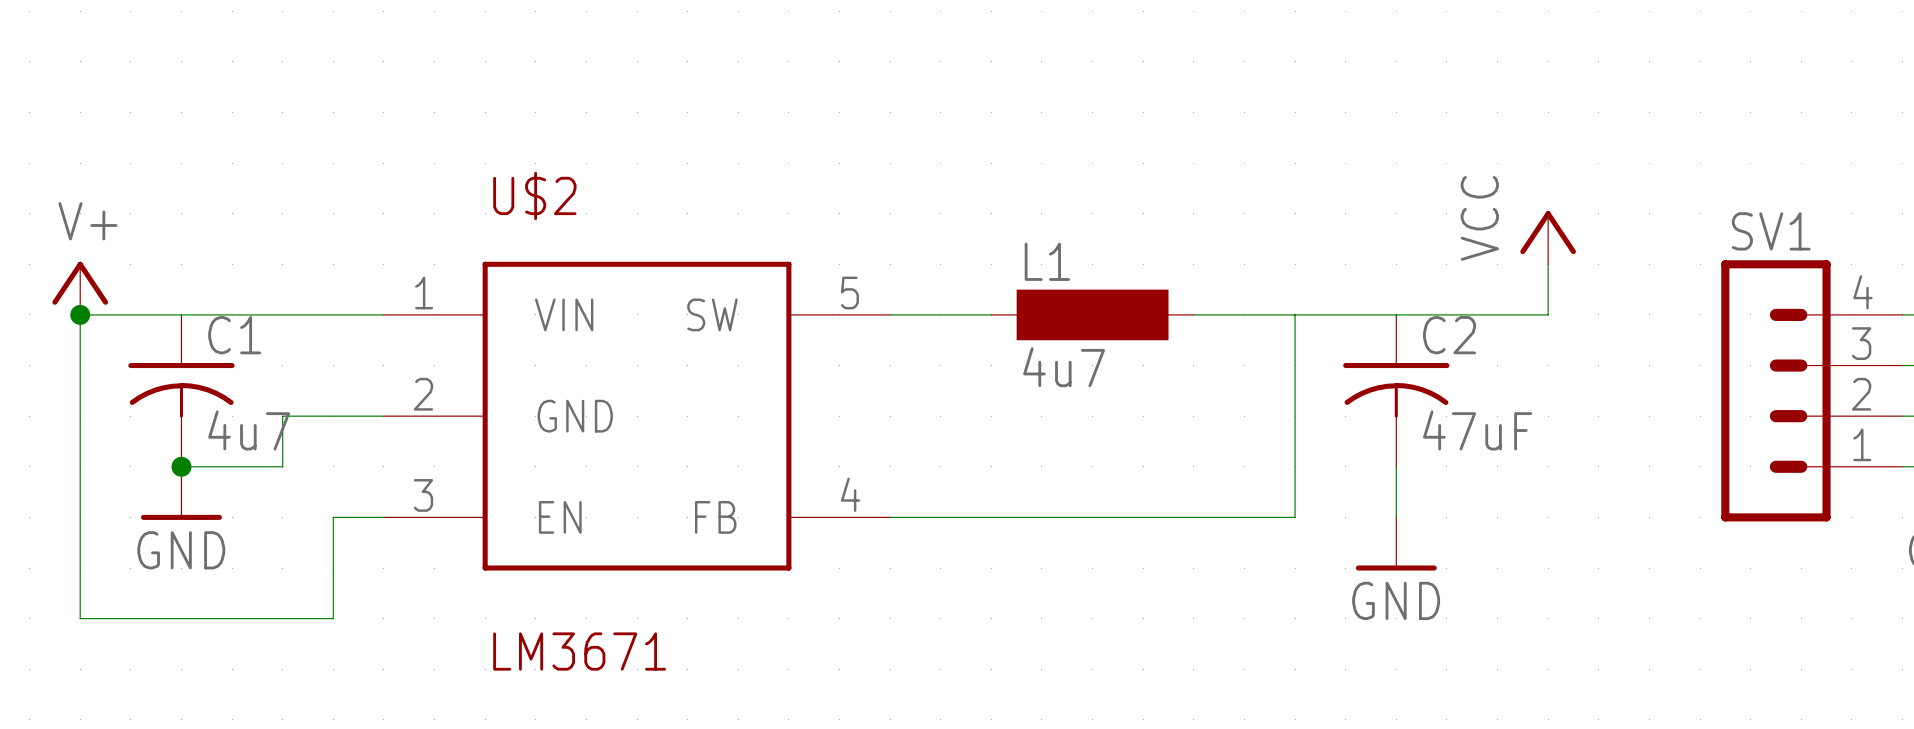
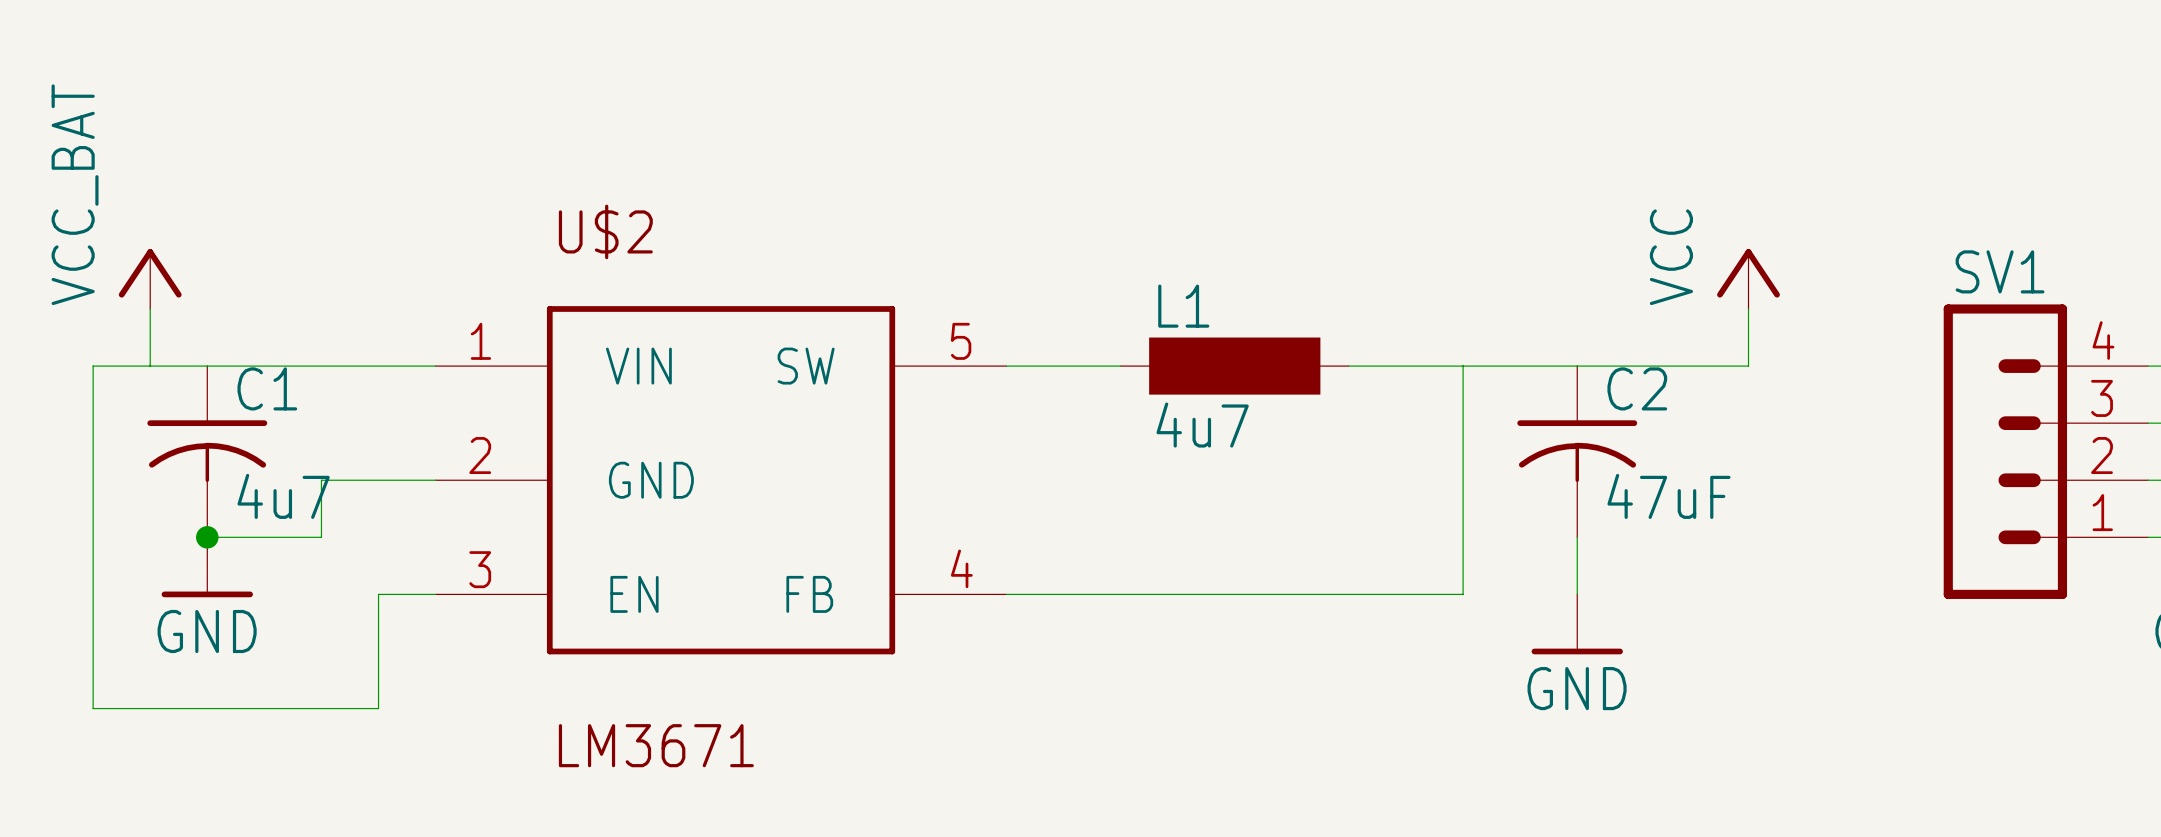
power symbol: none -> VCC_BAT (150, 279)
wire: none -> (150, 308) (150, 366)
power symbol: V+ (80, 288) -> none
junction: (80, 314) -> none

